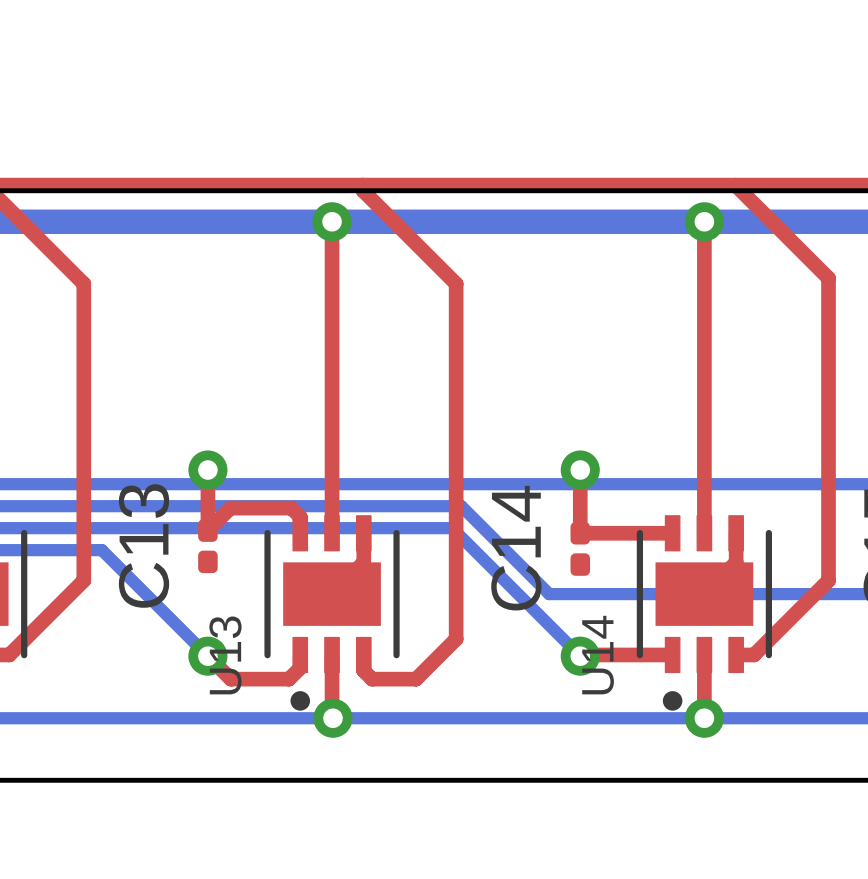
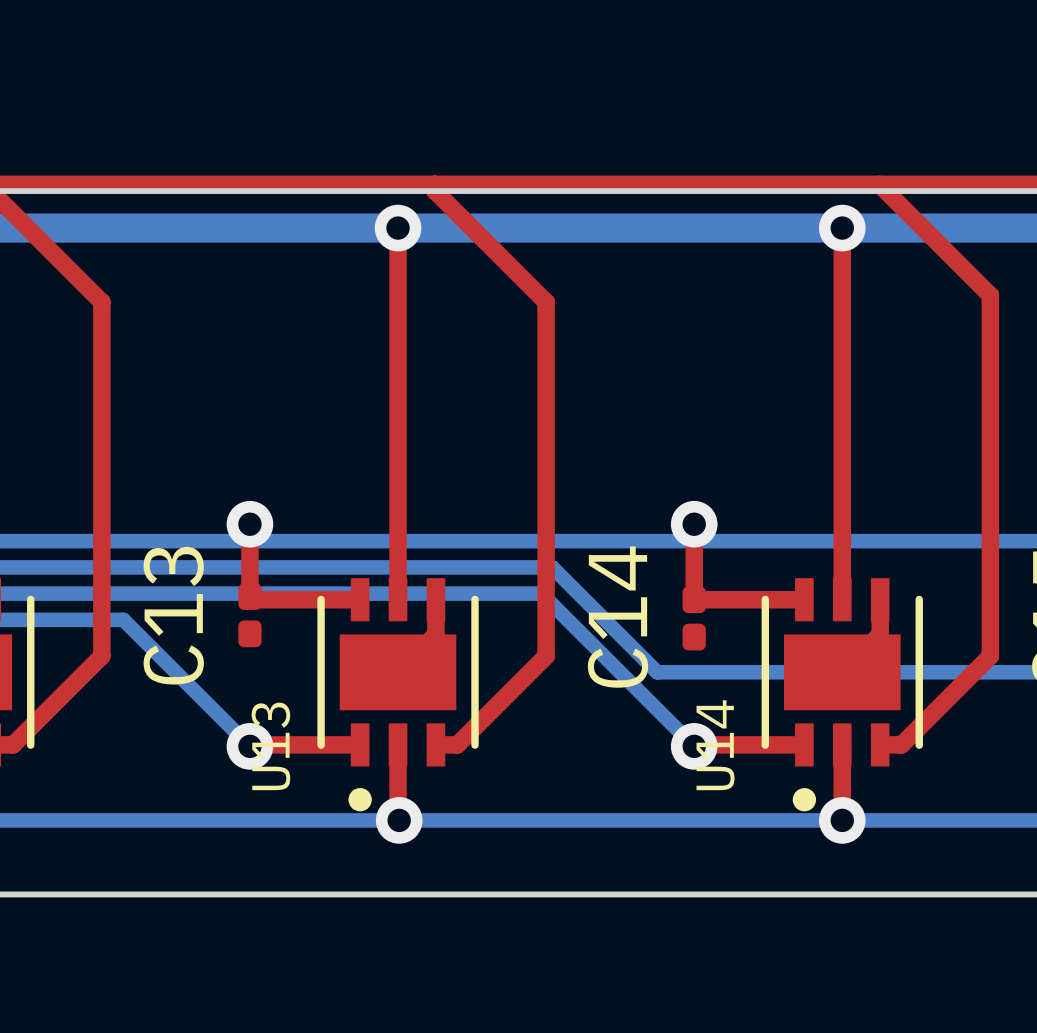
top track: (207, 530) (230, 508) (291, 508) (300, 516) (300, 533) -> (249, 596) (253, 599) (360, 599)
top track: (456, 580) (456, 639) (416, 679) (372, 679) (363, 670) (363, 654) -> (546, 656) (457, 744) (435, 744)
top track: (300, 654) (300, 667) (289, 679) (230, 679) (207, 656) -> (360, 744) (249, 746)

